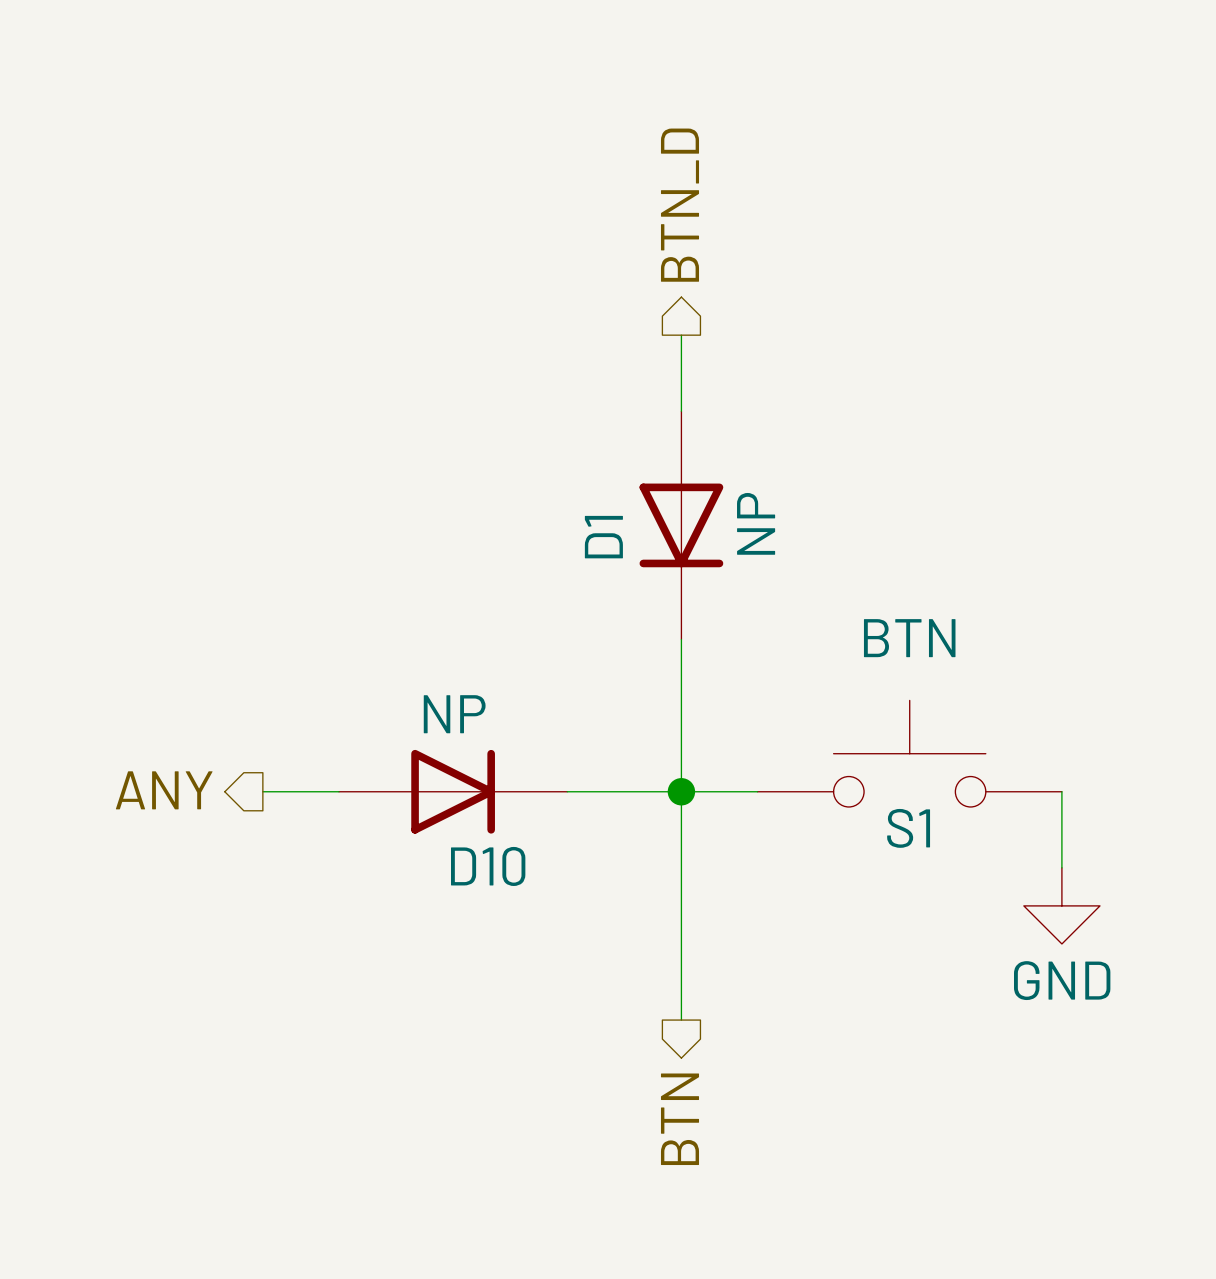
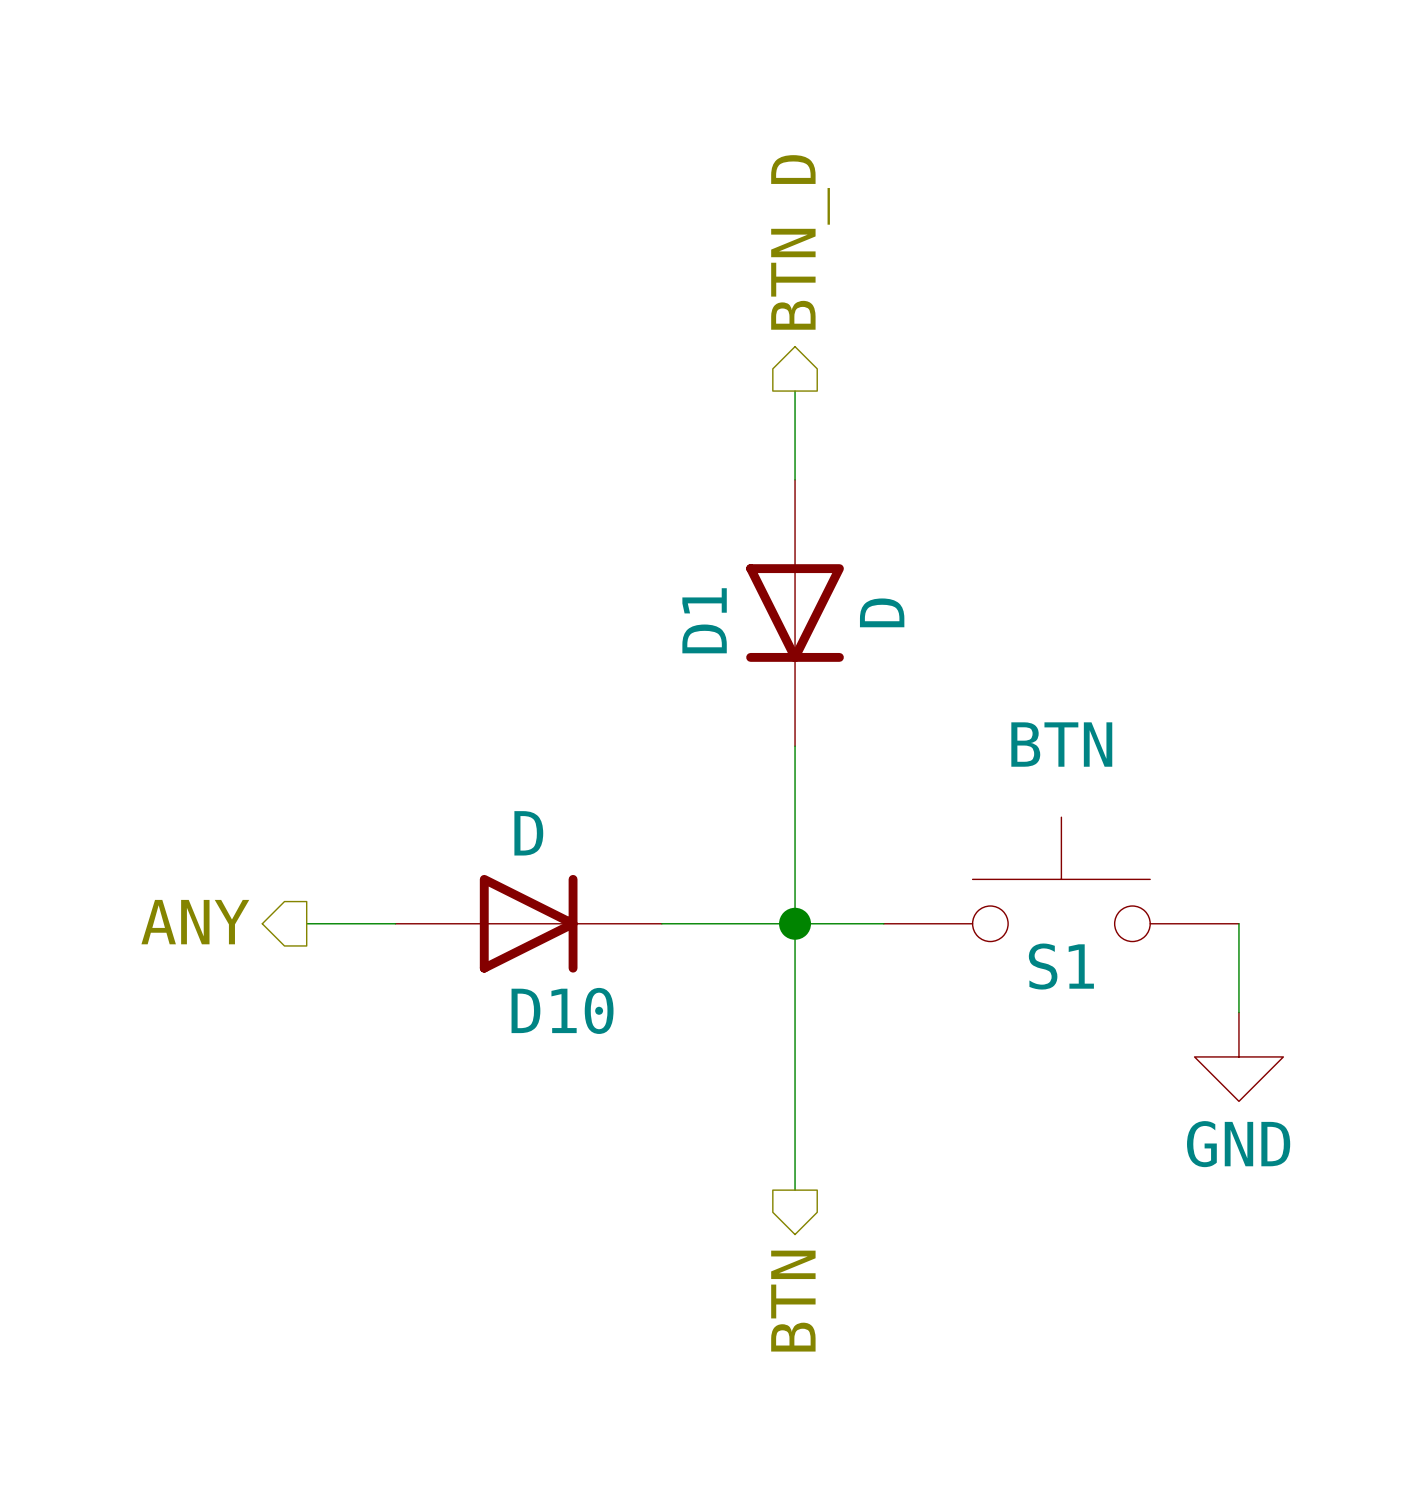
D1 value: NP (756, 523) -> D (882, 612)
D10 value: NP (454, 714) -> D (528, 833)

